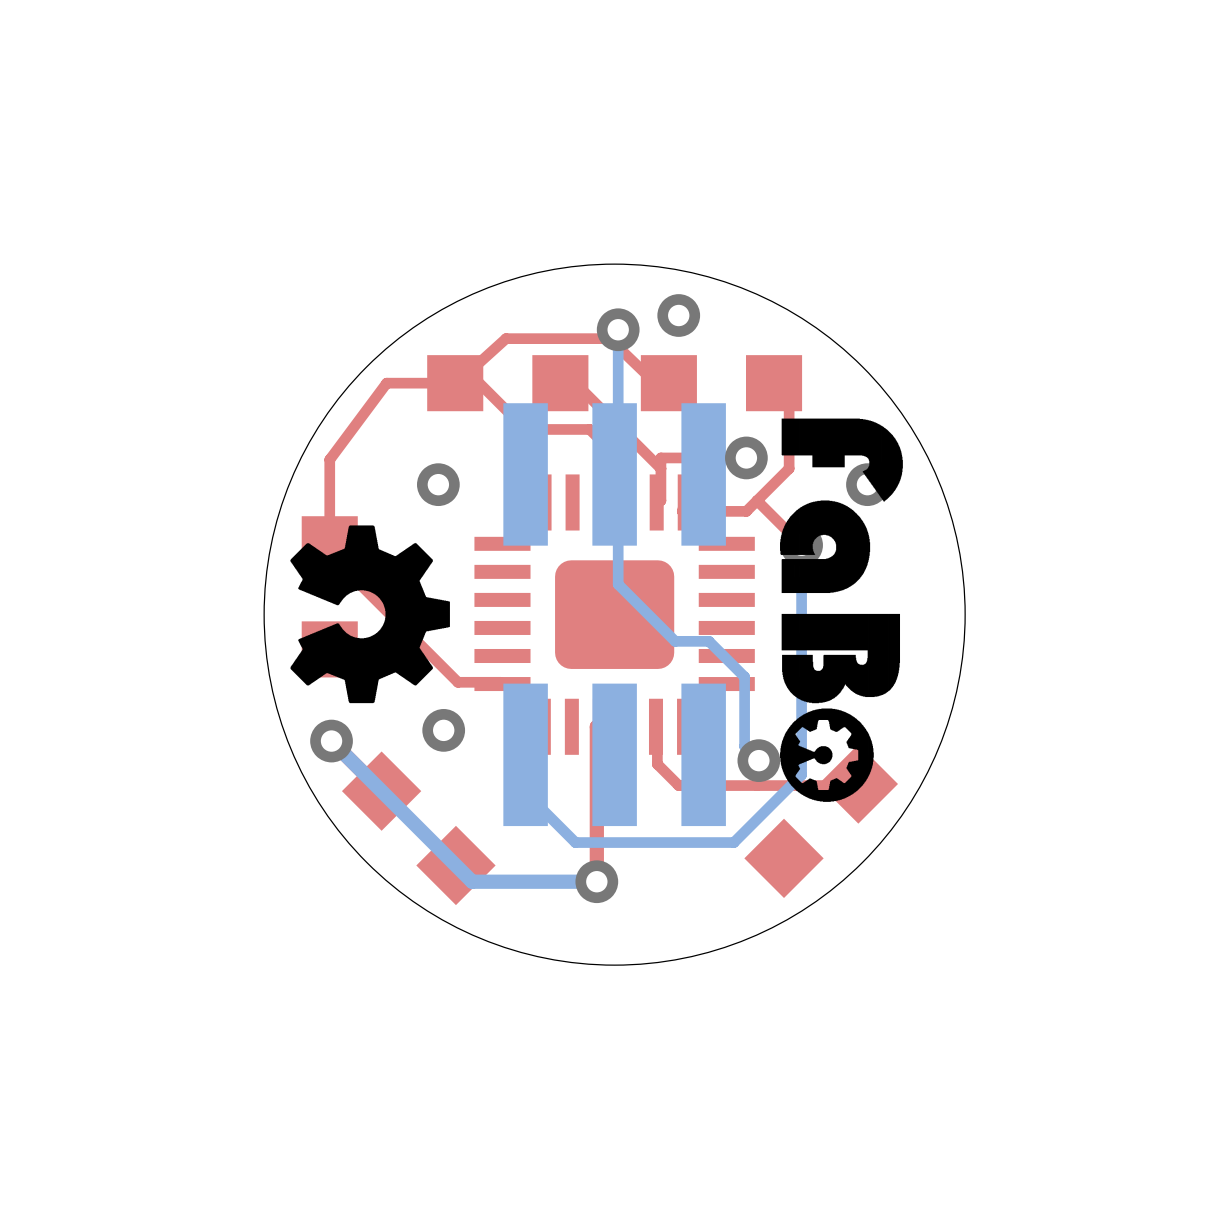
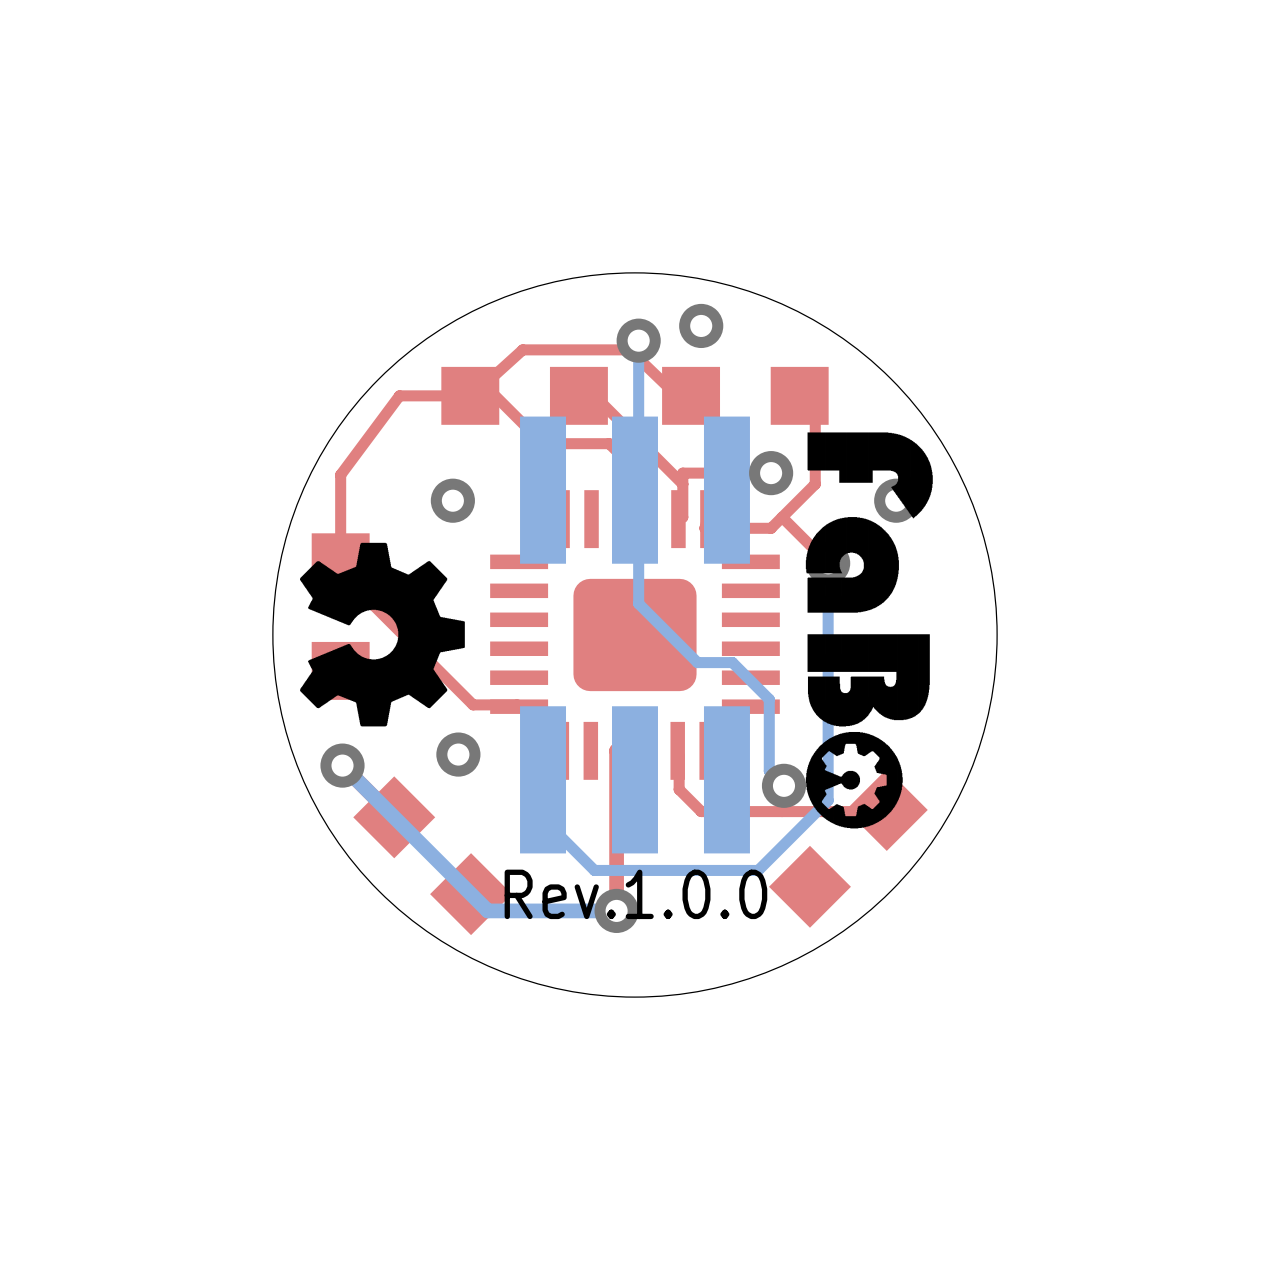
text: none -> Rev.1.0.0 (635, 894)

